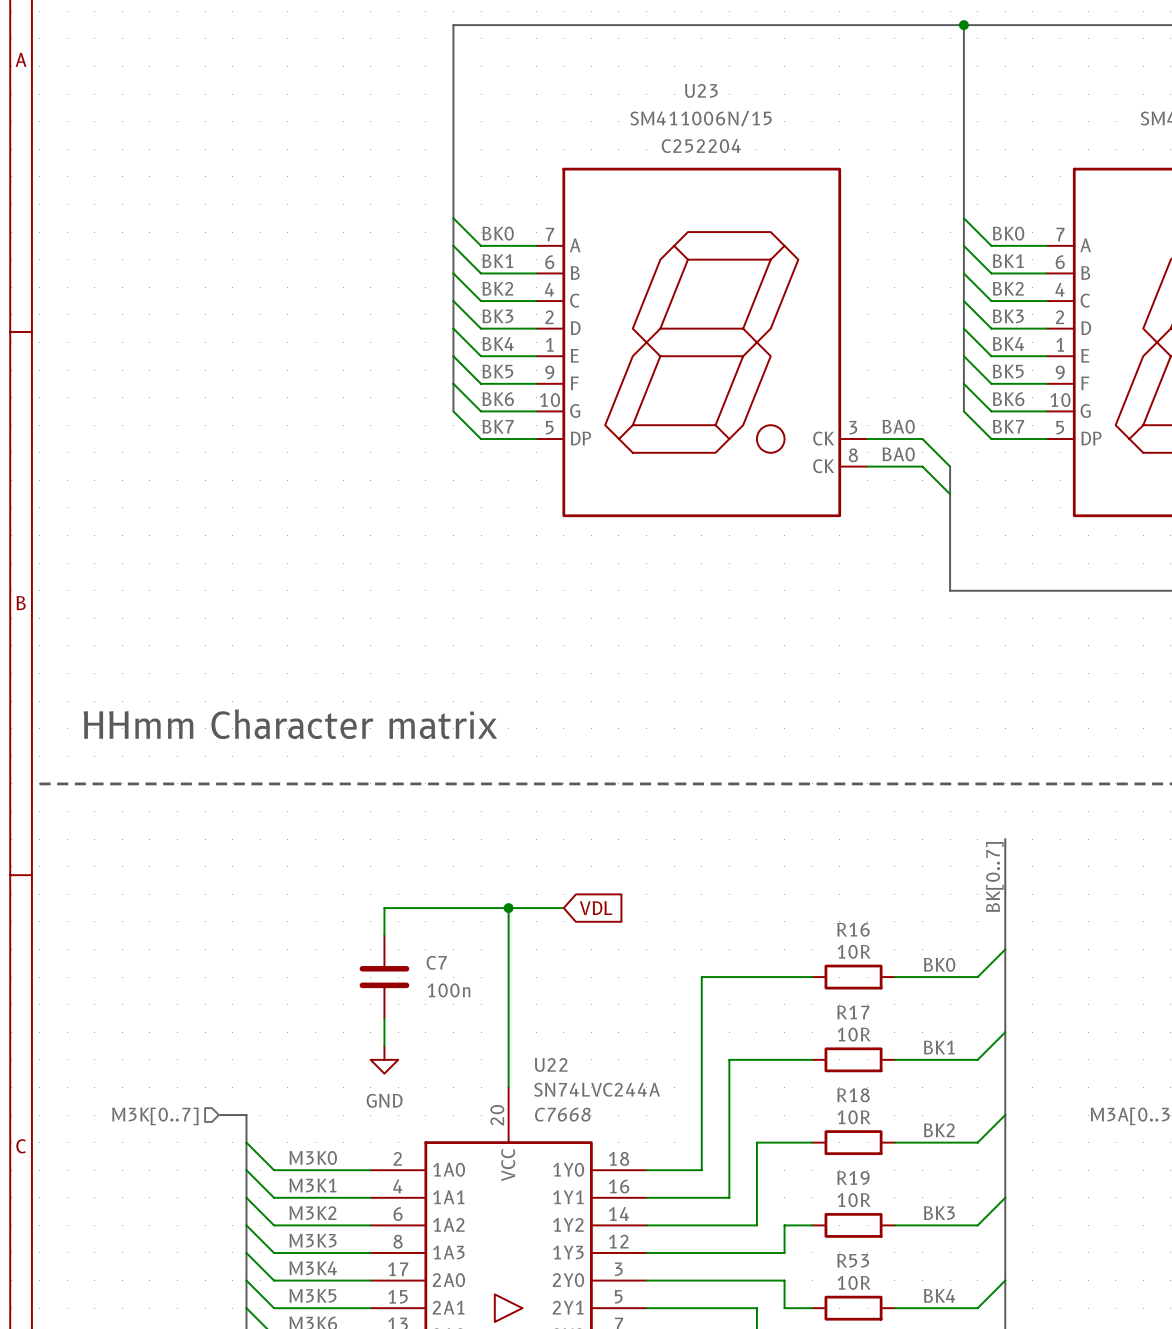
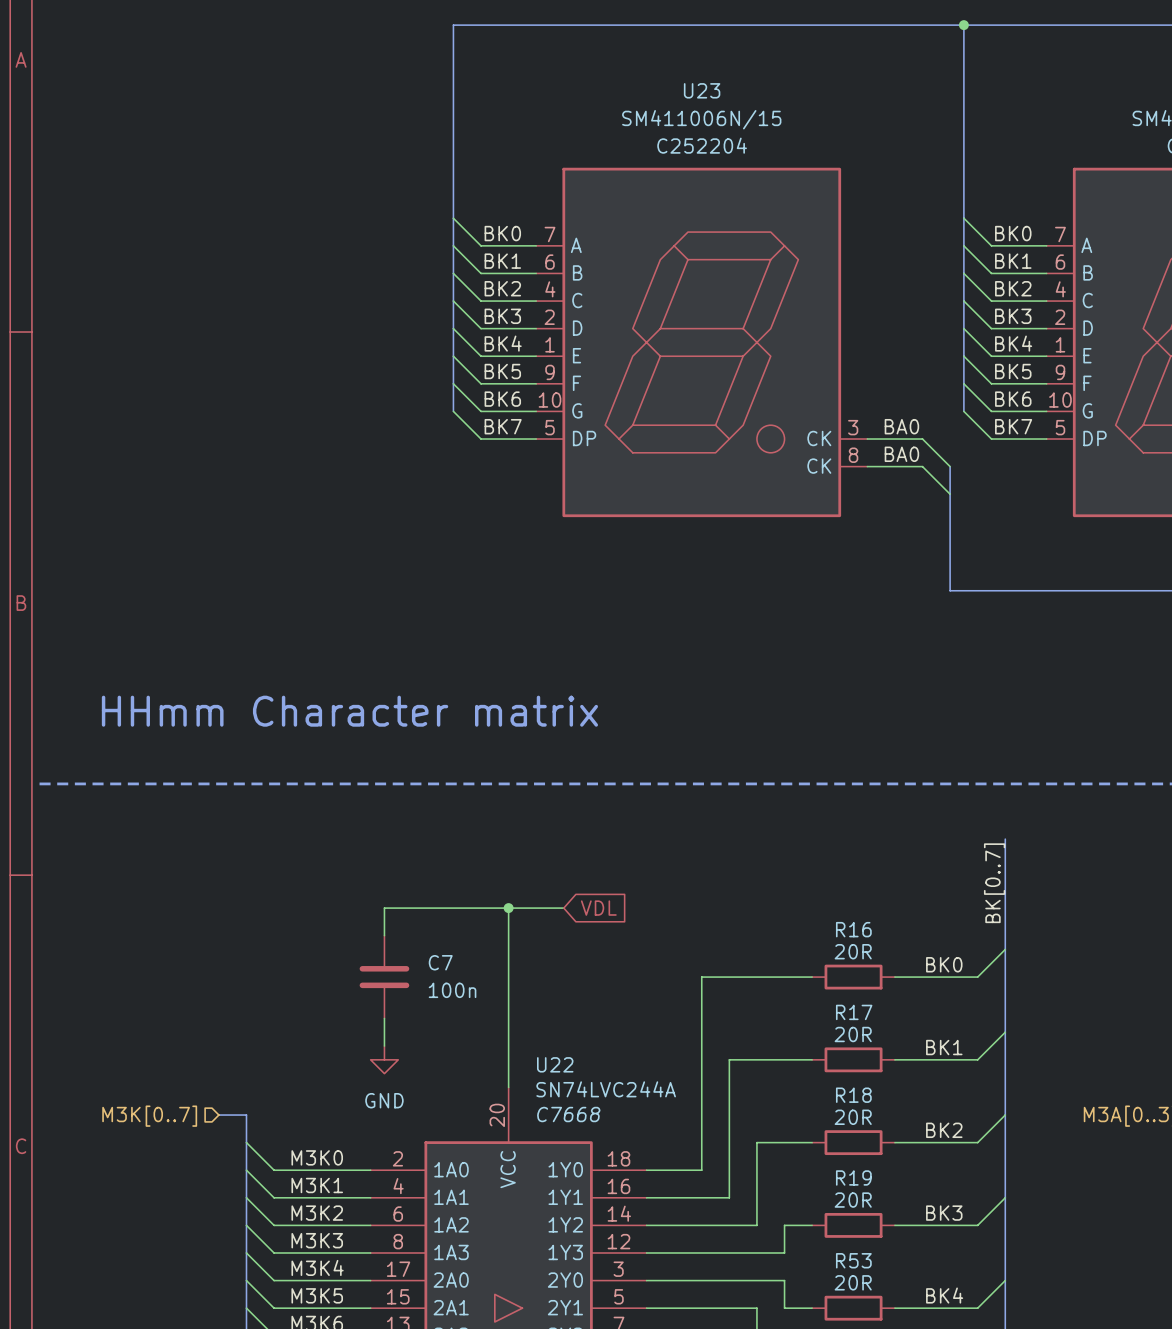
text position: HHmm Character matrix (290, 724) -> HHmm Character matrix (349, 711)
R16 value: 10R (854, 951) -> 20R (853, 951)
R17 value: 10R (854, 1034) -> 20R (853, 1034)
R18 value: 10R (854, 1117) -> 20R (853, 1117)
R19 value: 10R (854, 1200) -> 20R (853, 1200)
R53 value: 10R (854, 1282) -> 20R (853, 1282)

